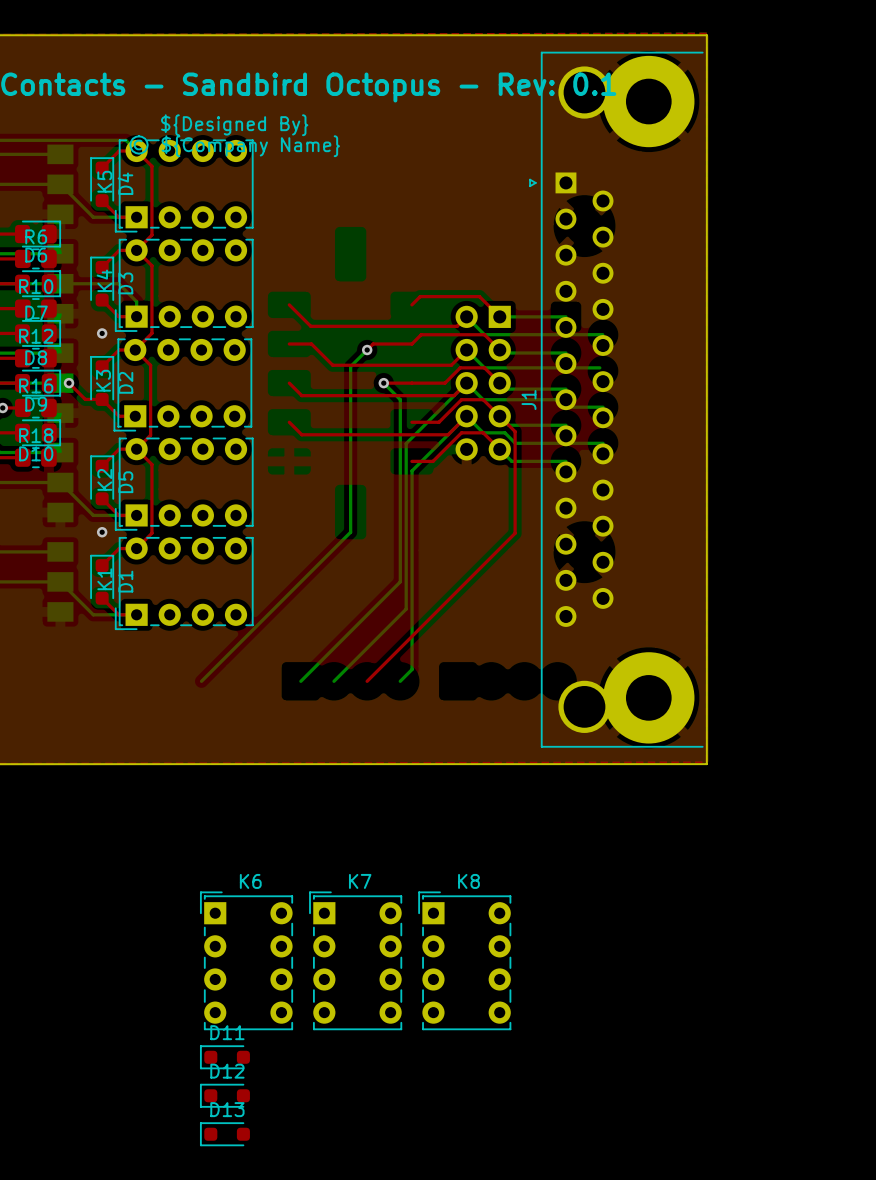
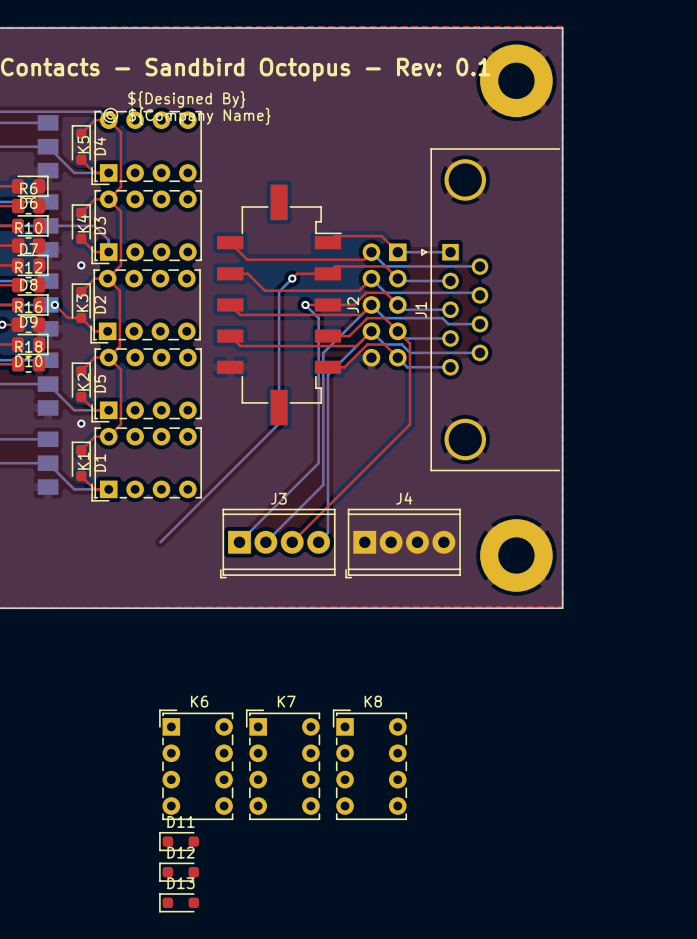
J1 footprint: [529, 51, 704, 748] -> [421, 148, 560, 472]
J2: none -> (279, 304)
J3: none -> (277, 543)
J4: none -> (403, 543)

